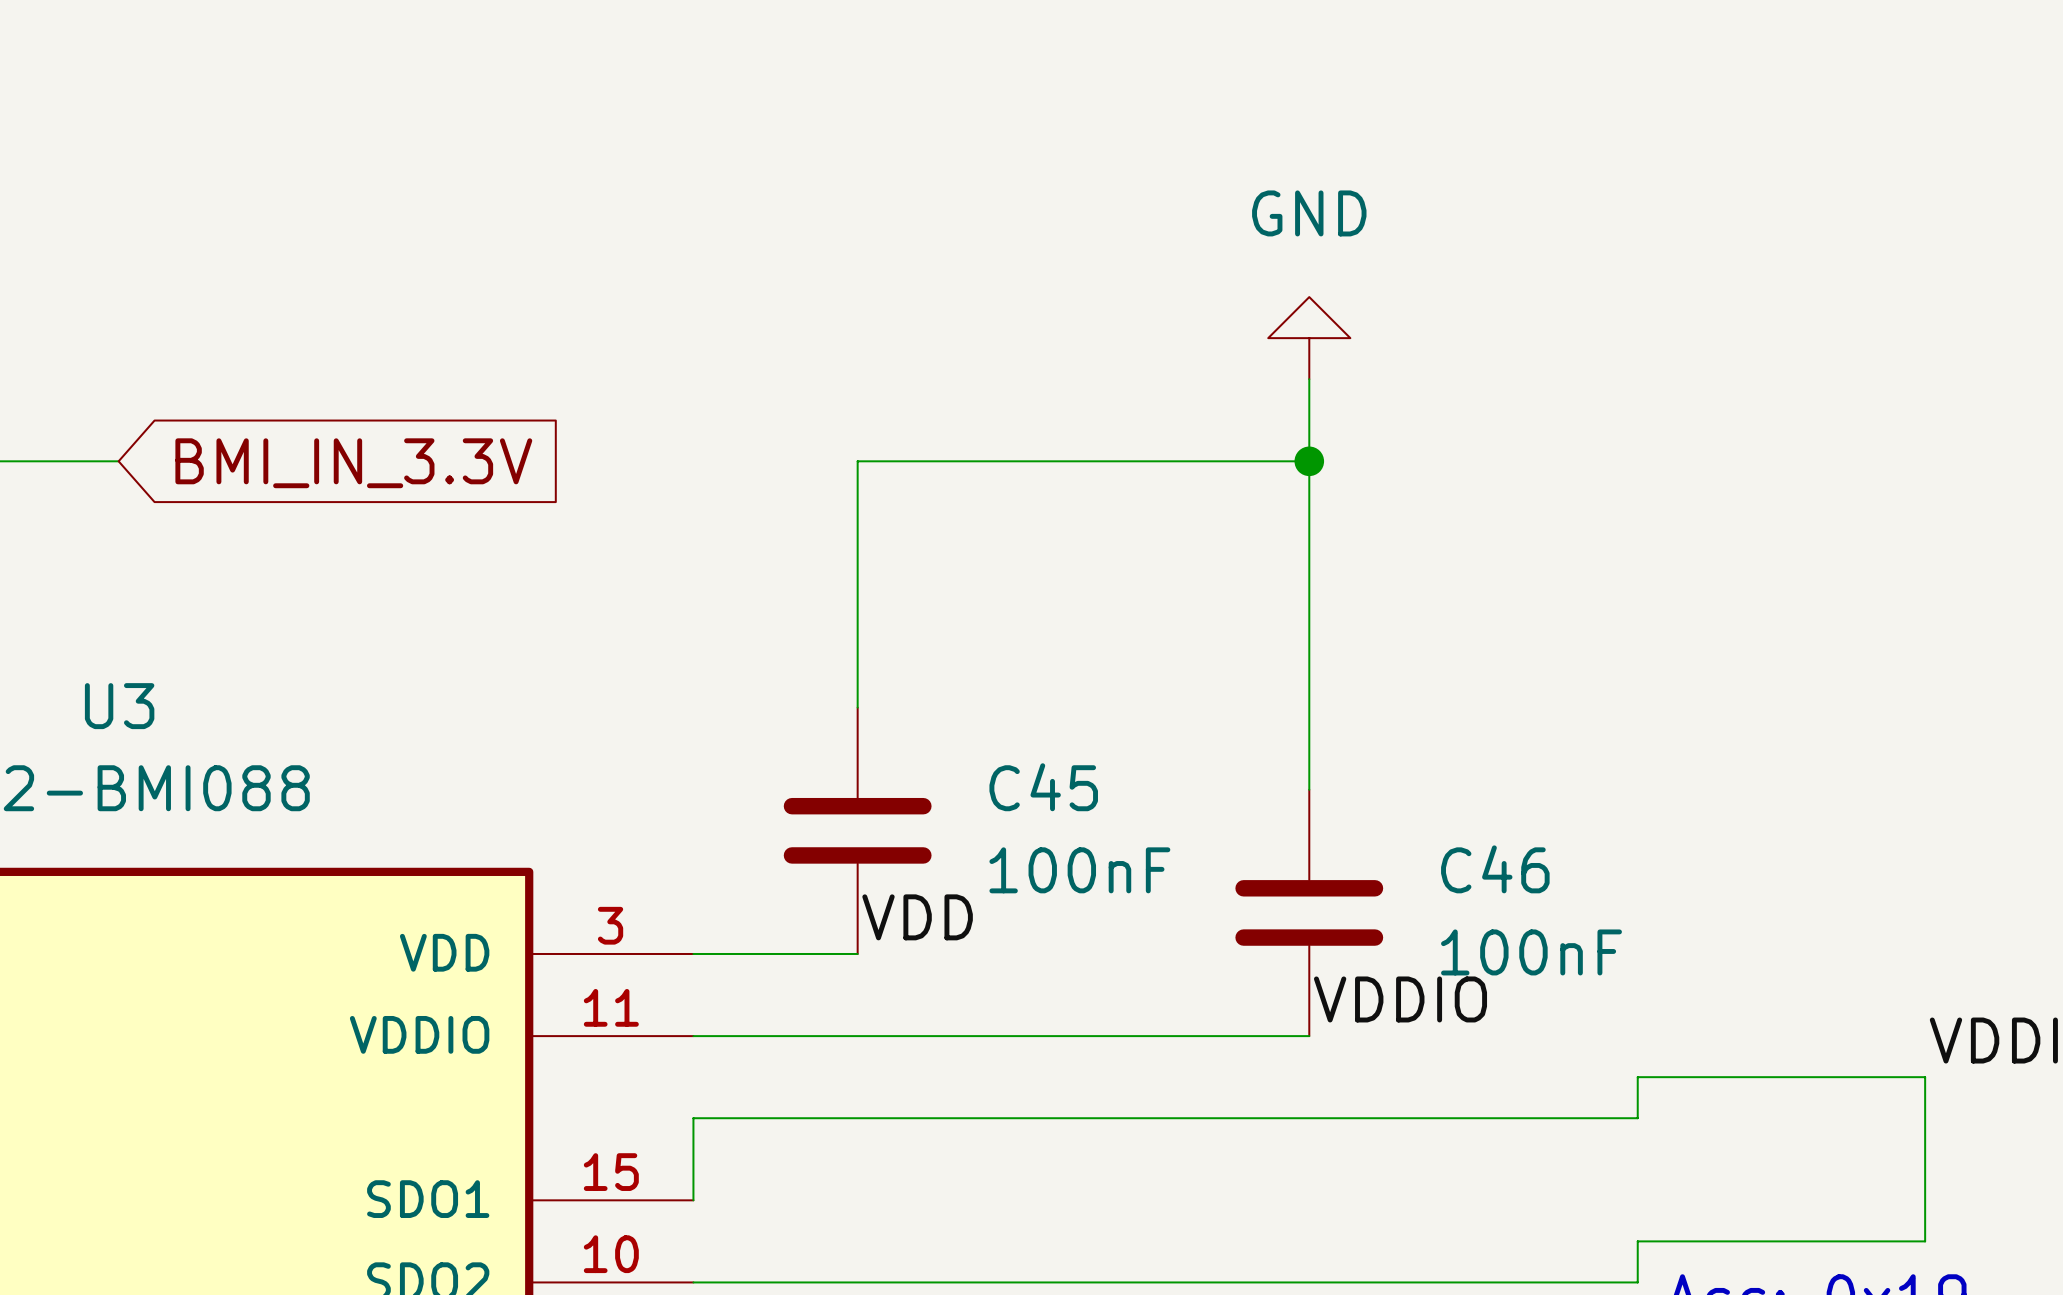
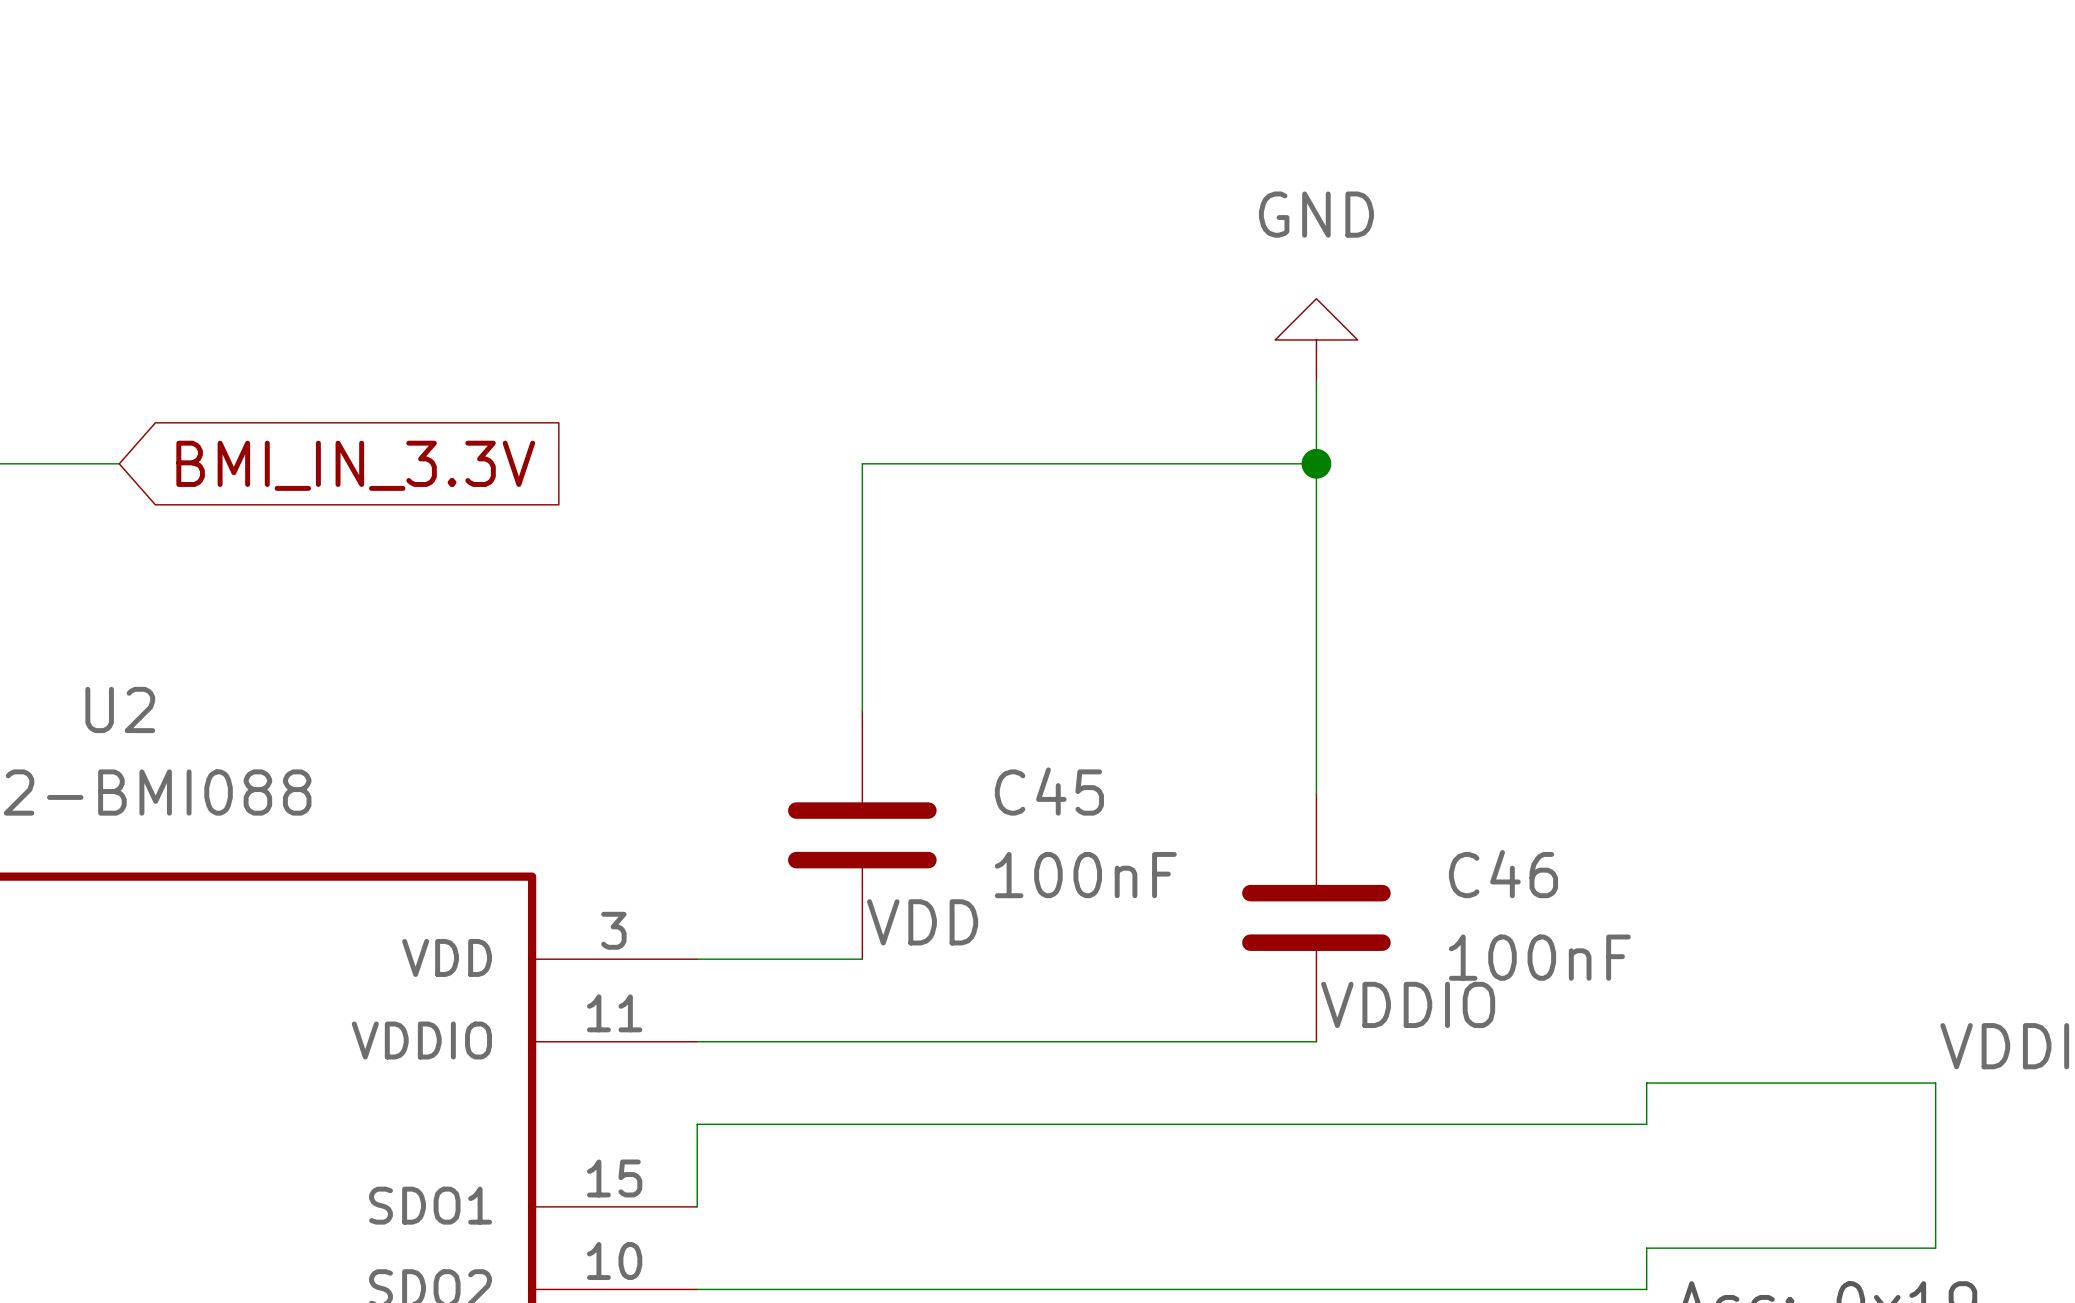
U3 name: U3 (119, 706) -> U2 (120, 709)

